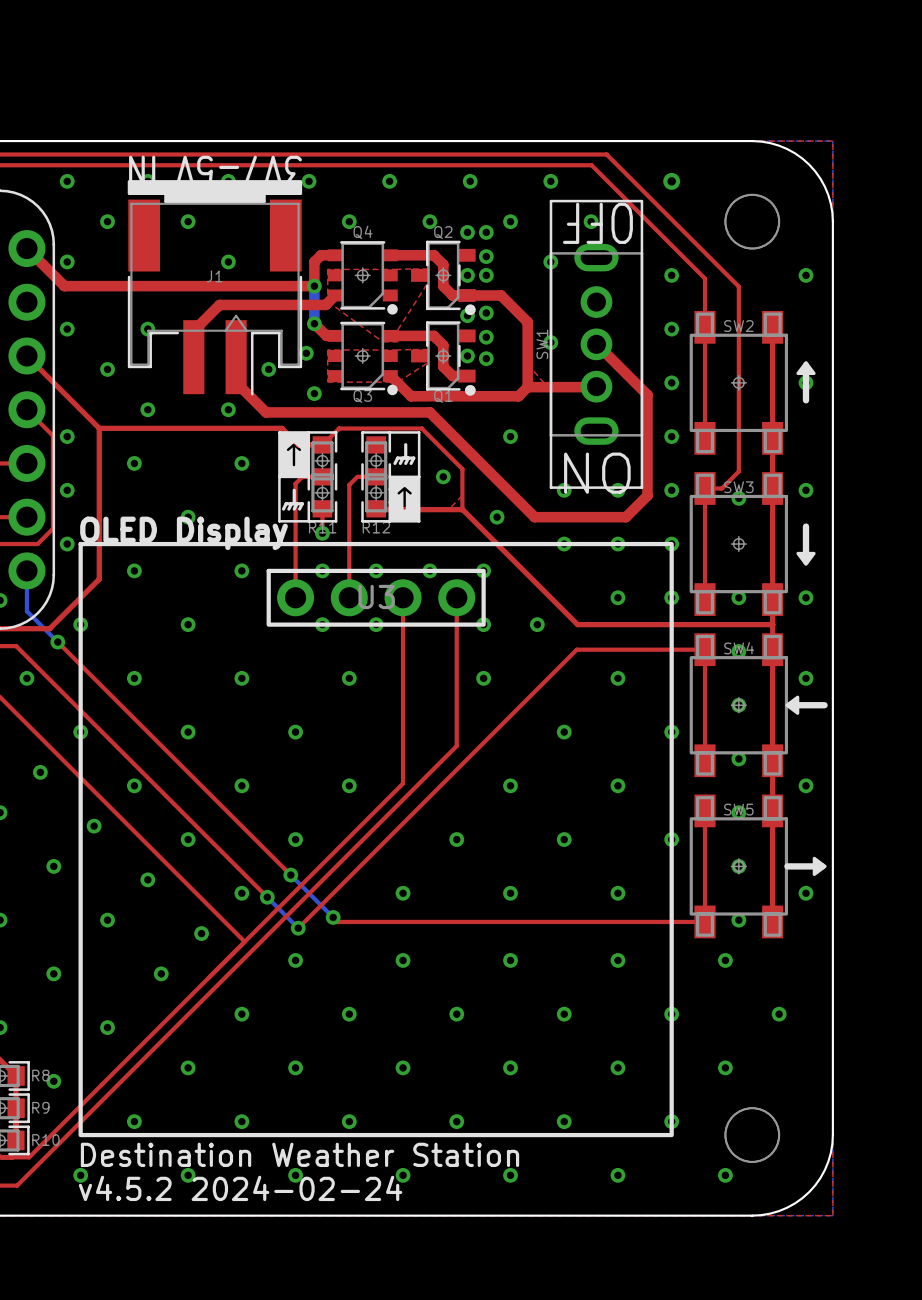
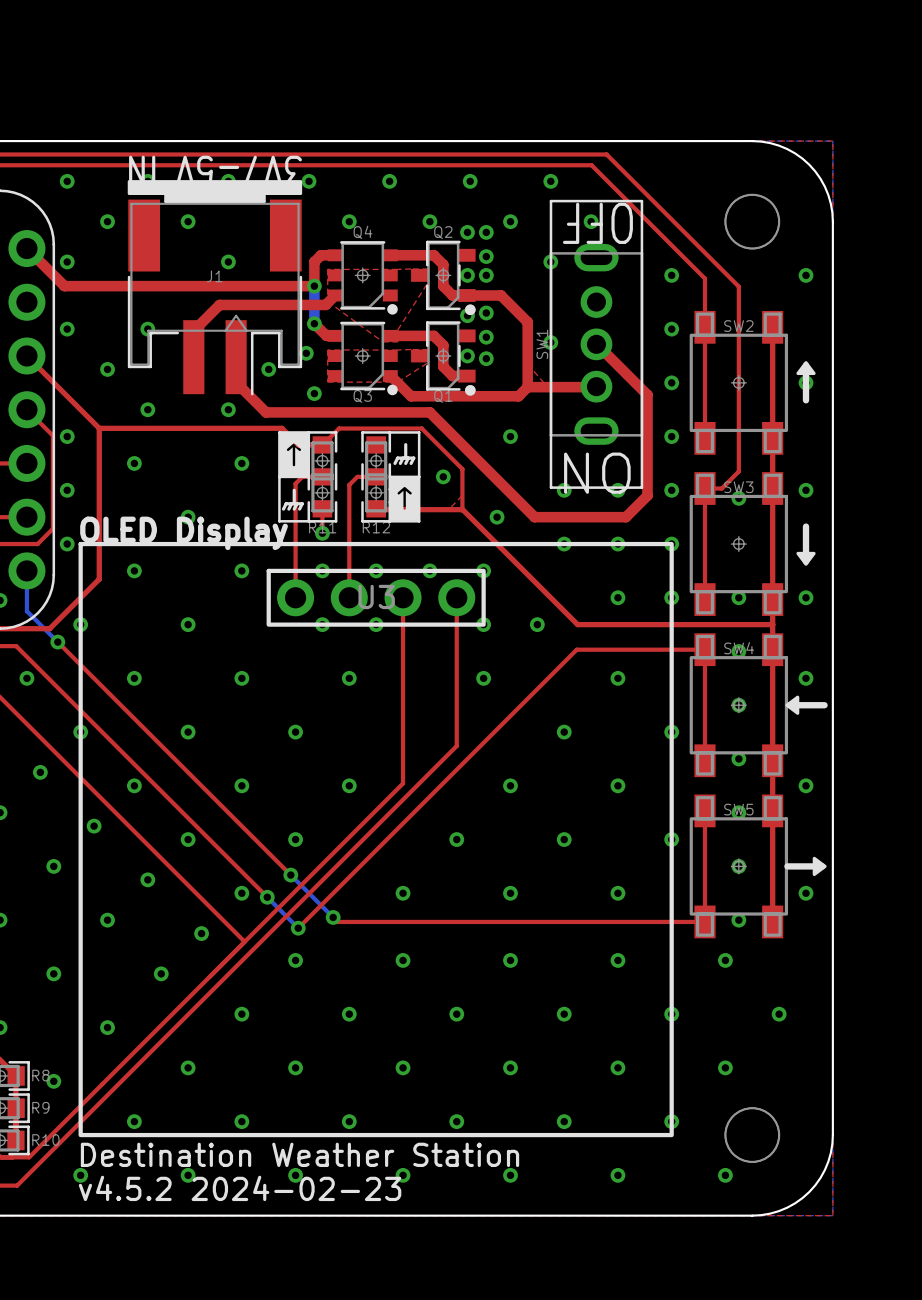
via: (671, 181) -> none
text: v4.5.2 2024-02-24 (240, 1188) -> v4.5.2 2024-02-23 (240, 1188)

